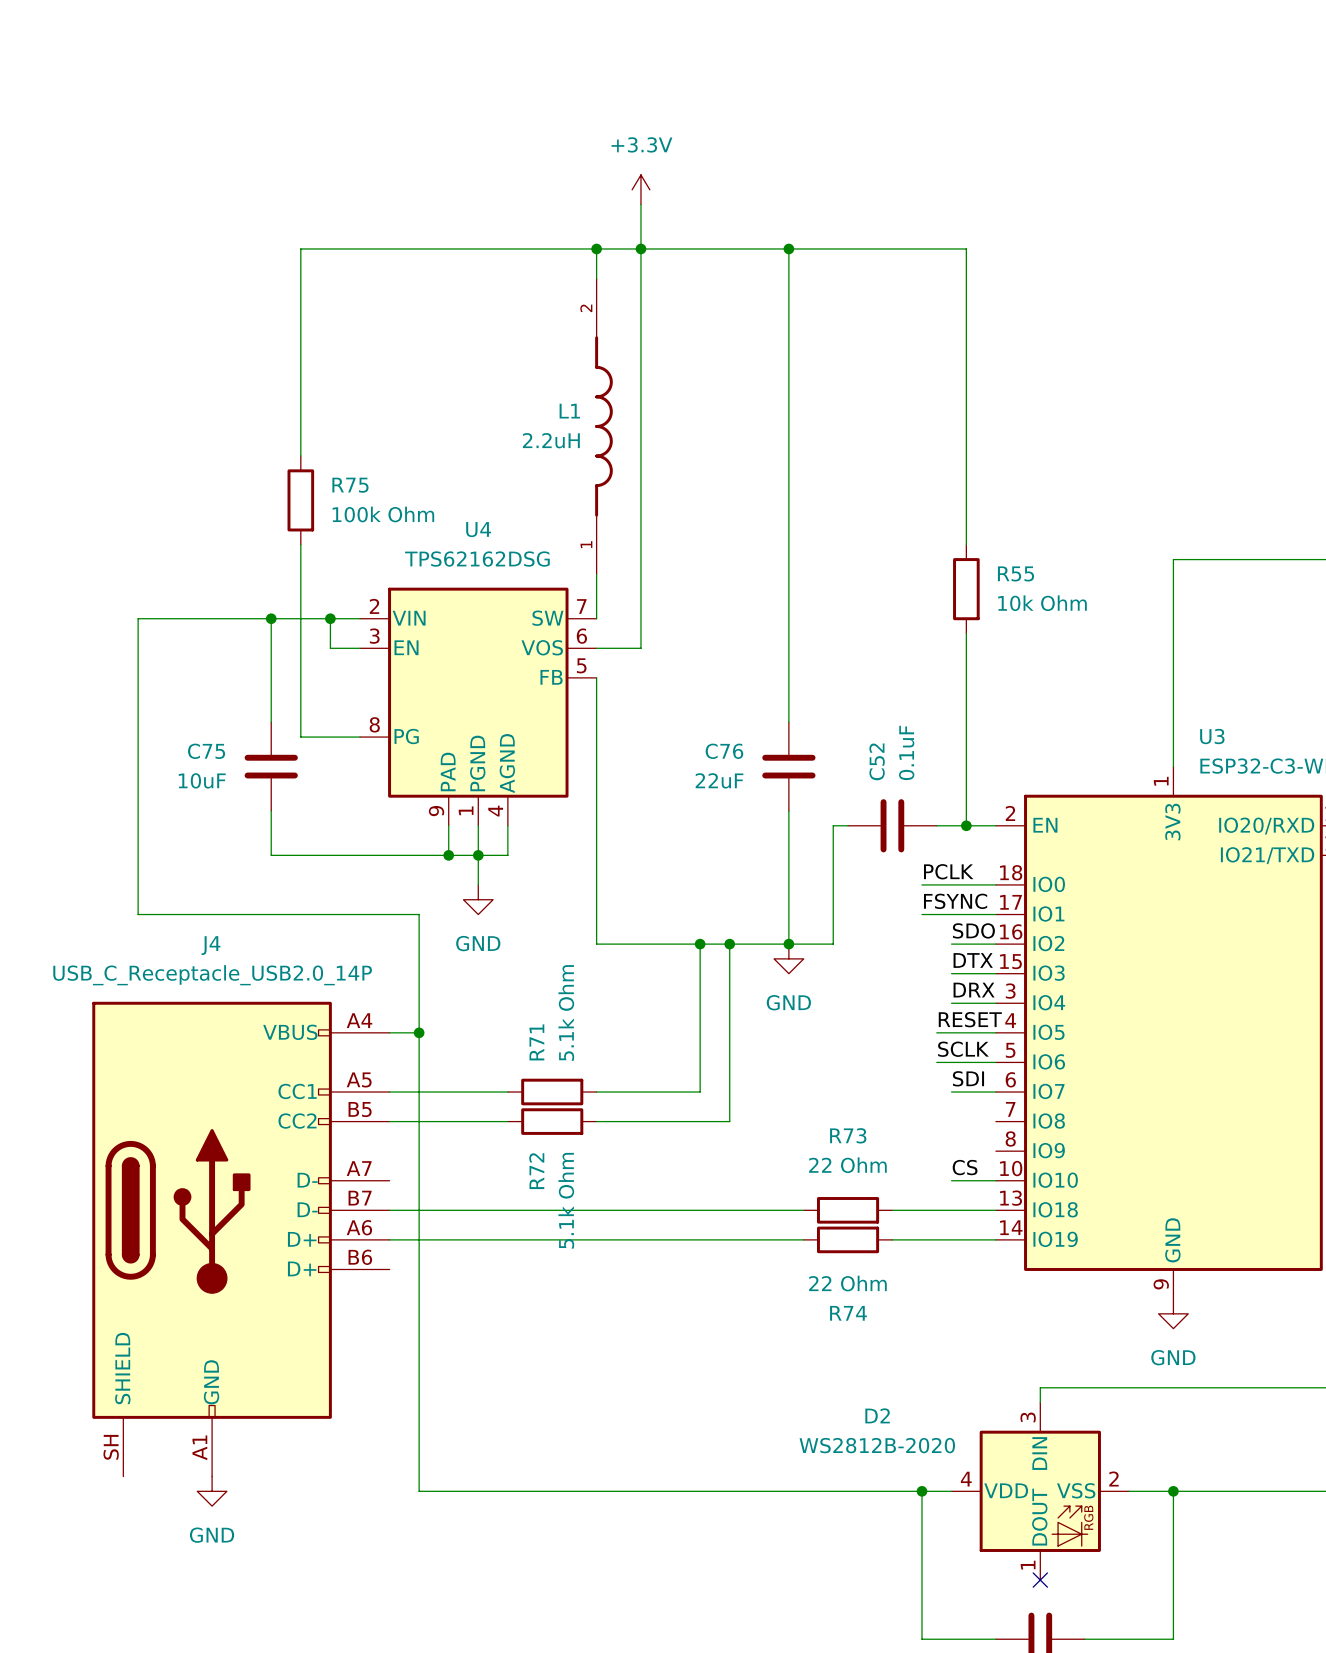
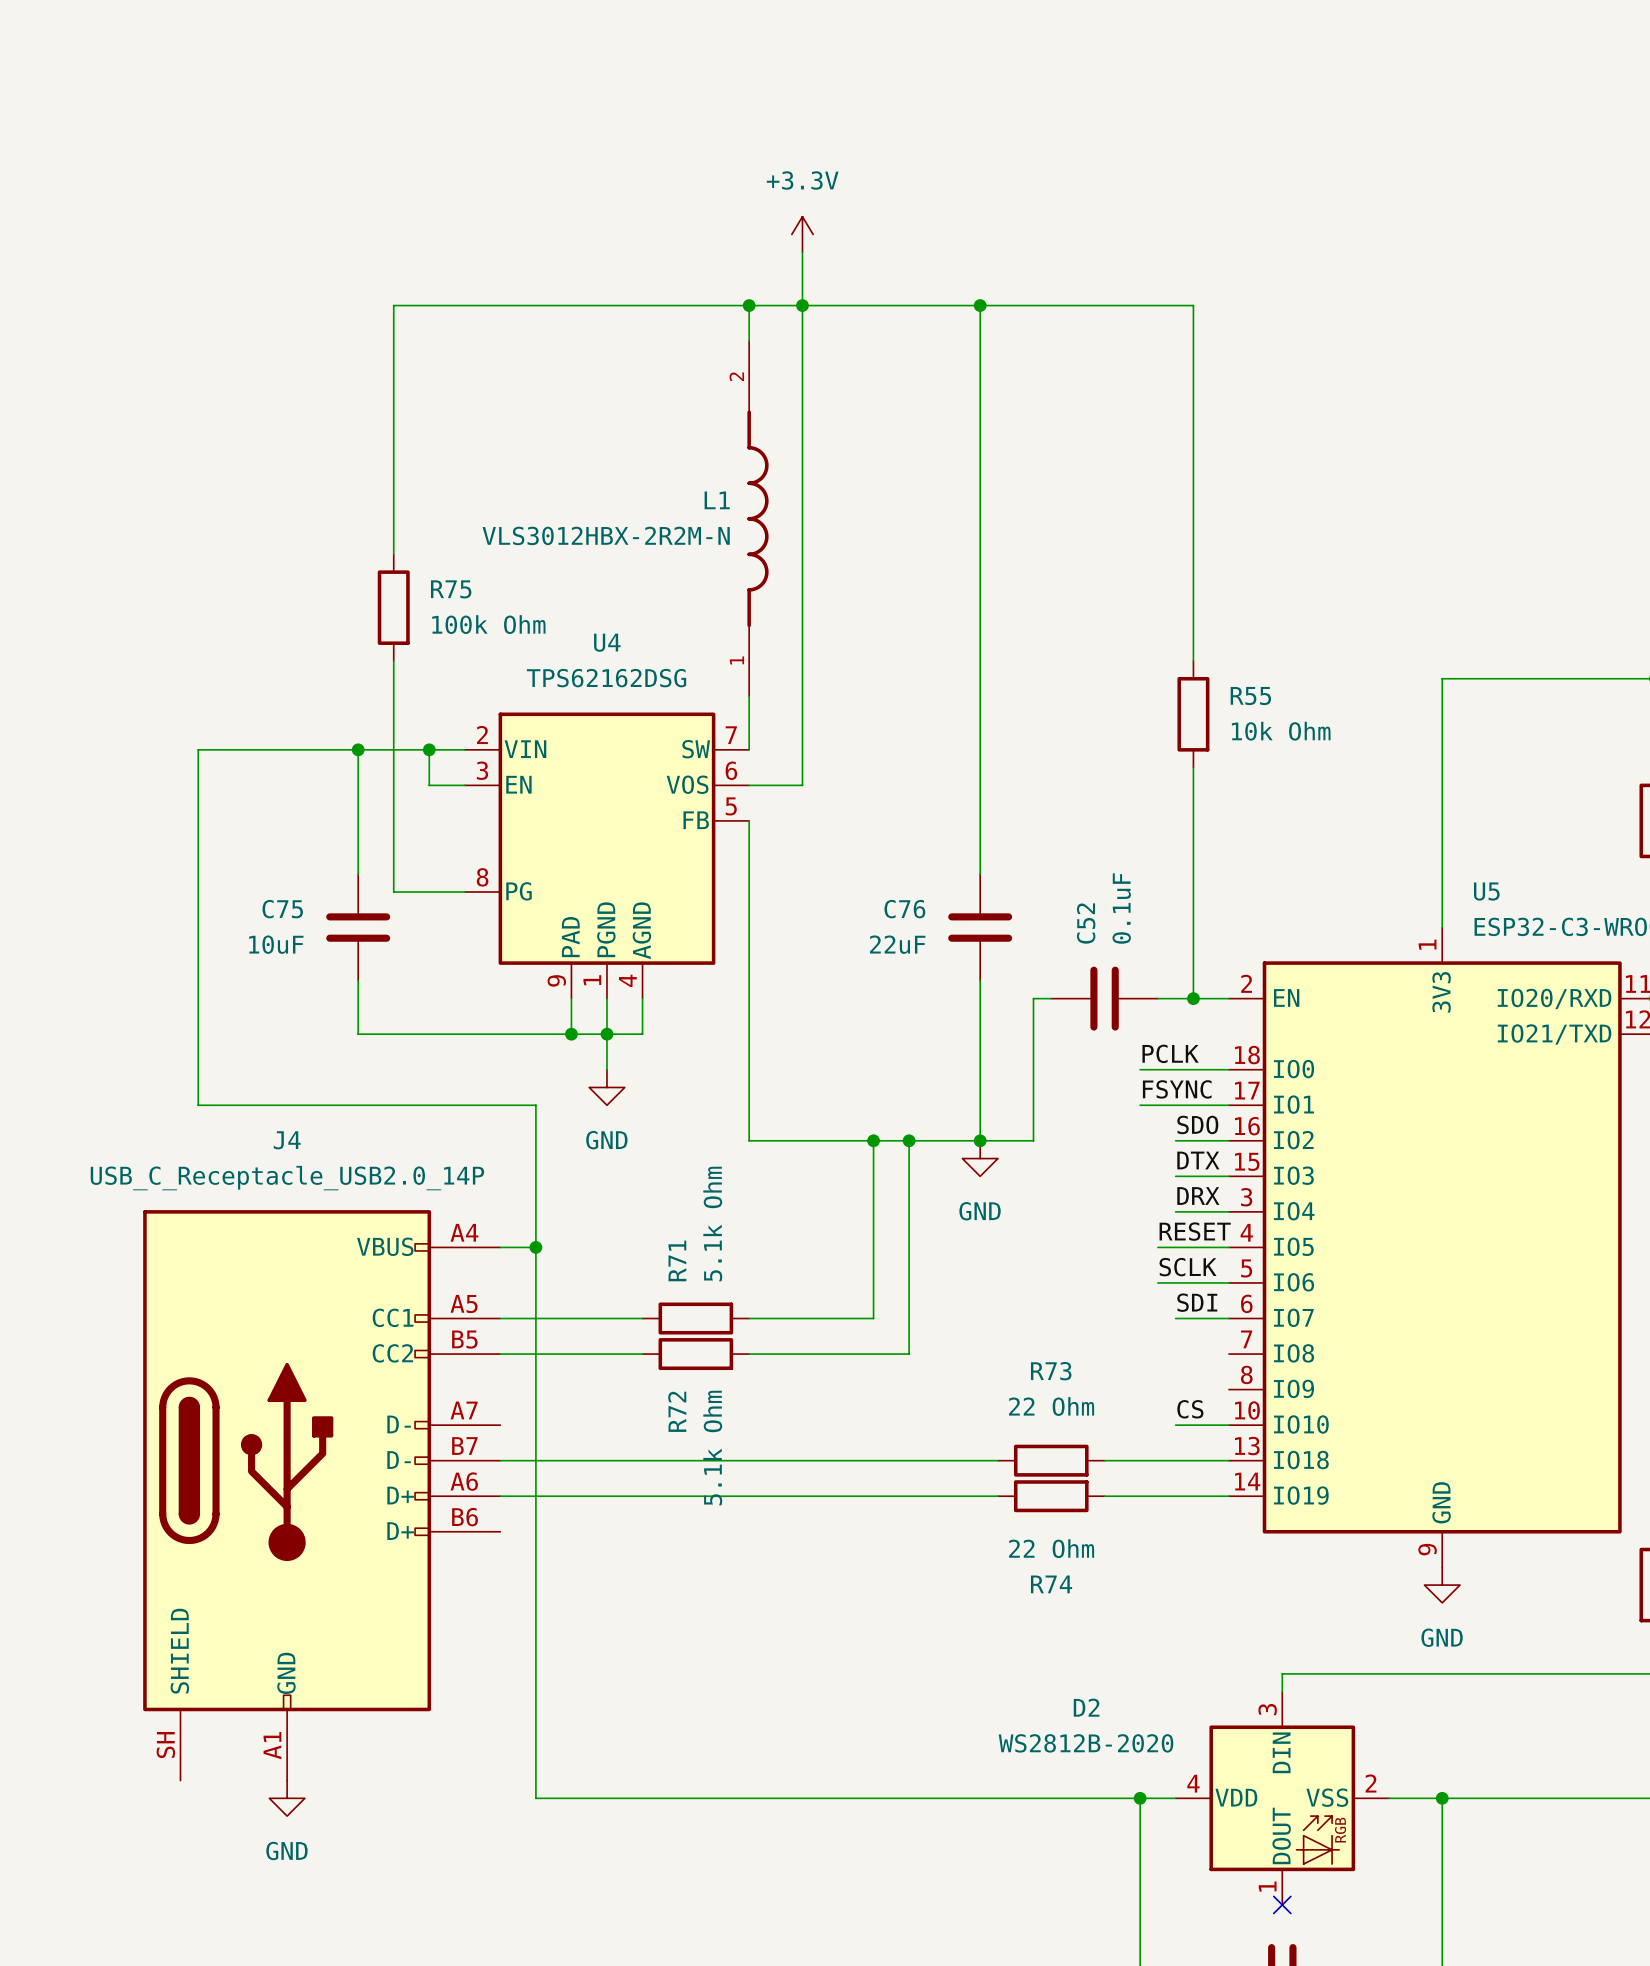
L1 value: 2.2uH (551, 440) -> VLS3012HBX-2R2M-N (606, 535)
U3 name: U3 (1212, 736) -> U5 (1486, 891)

